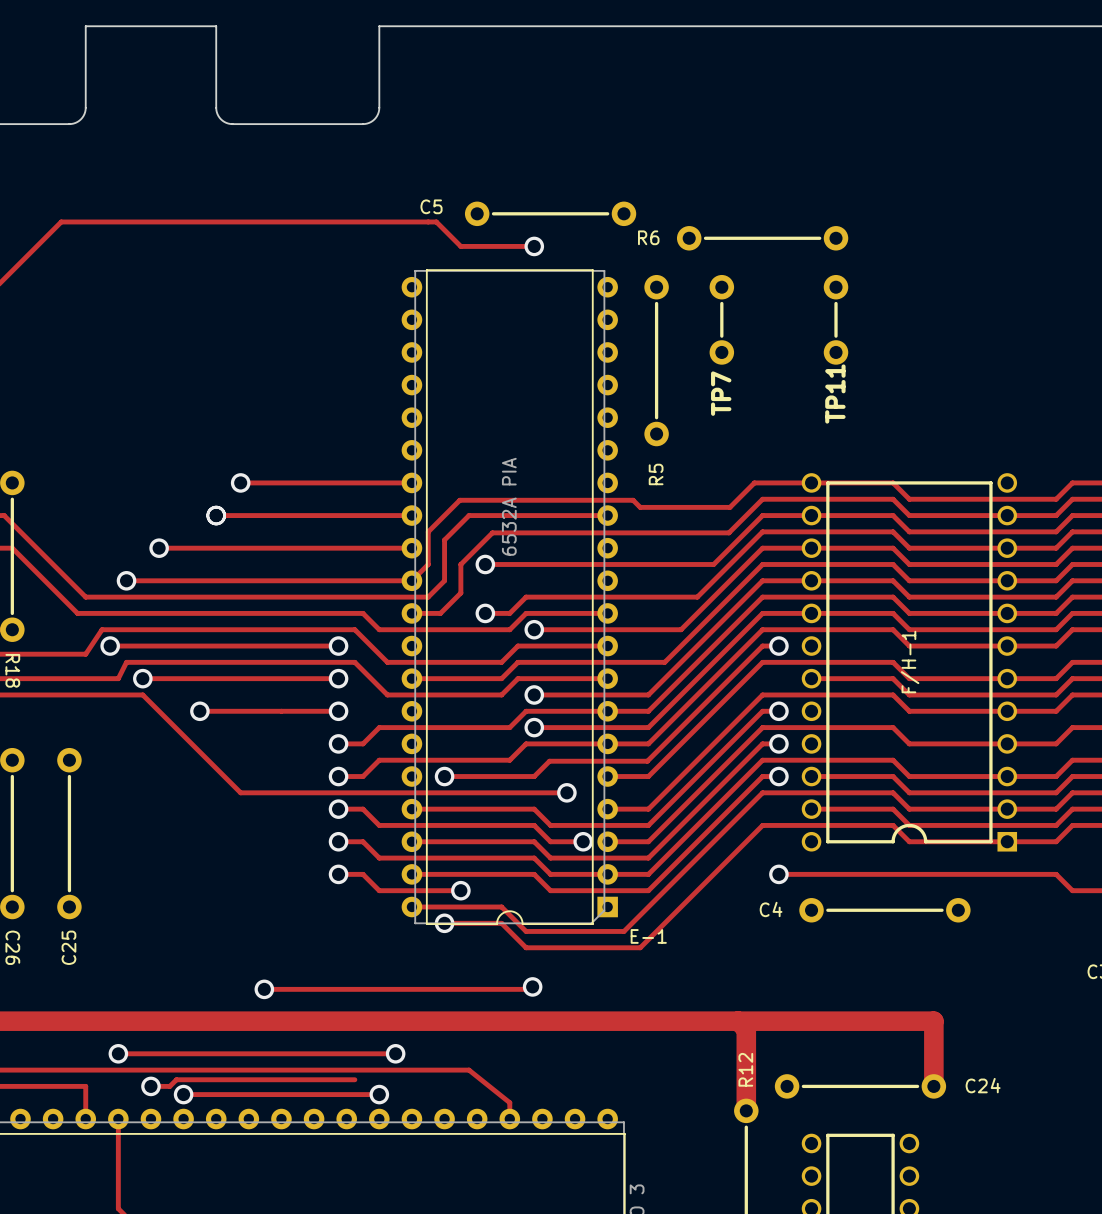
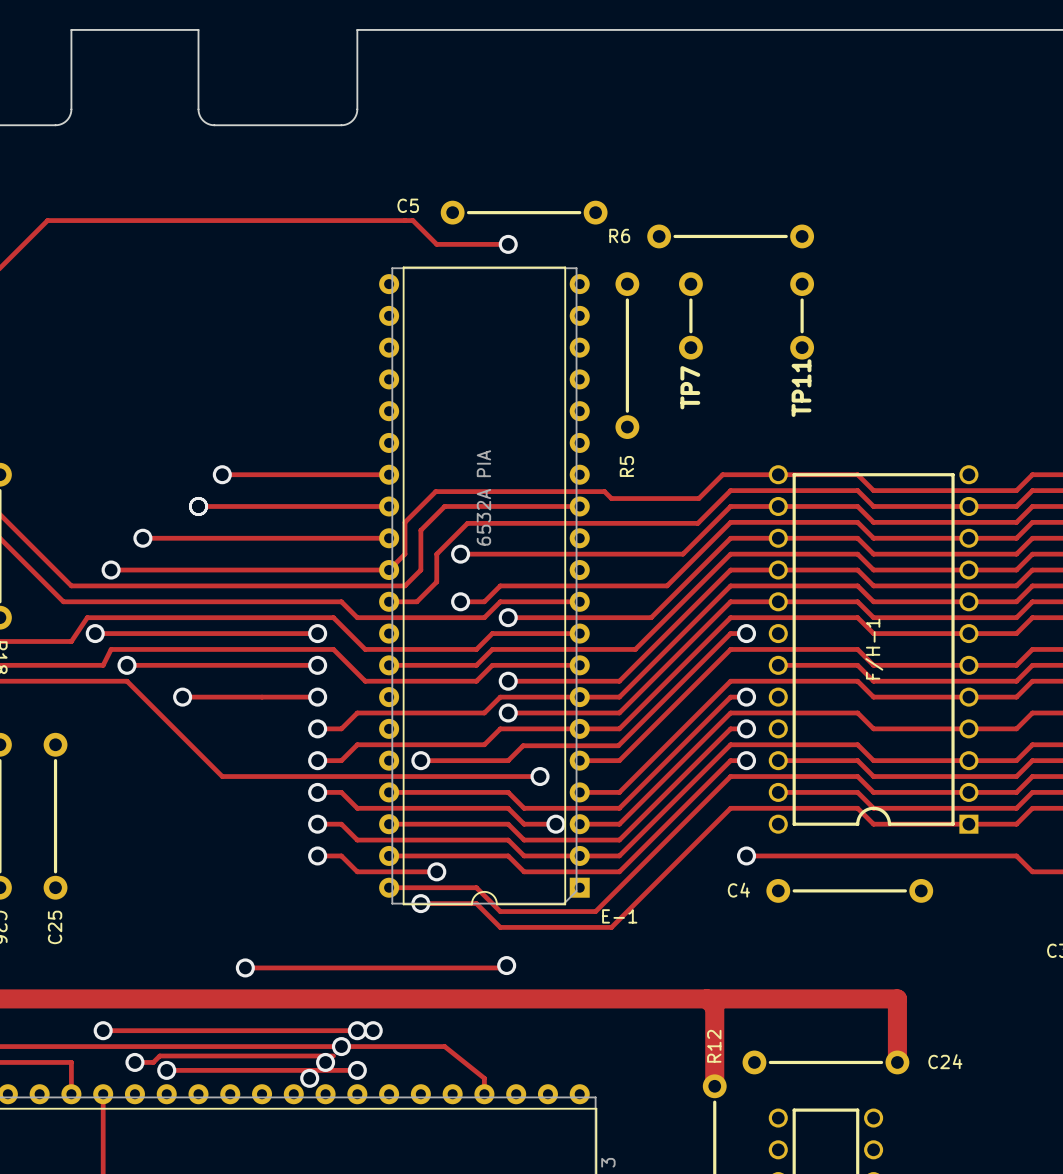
via: none -> (357, 1030)
via: none -> (341, 1046)
via: none -> (325, 1062)
via: none -> (309, 1078)

